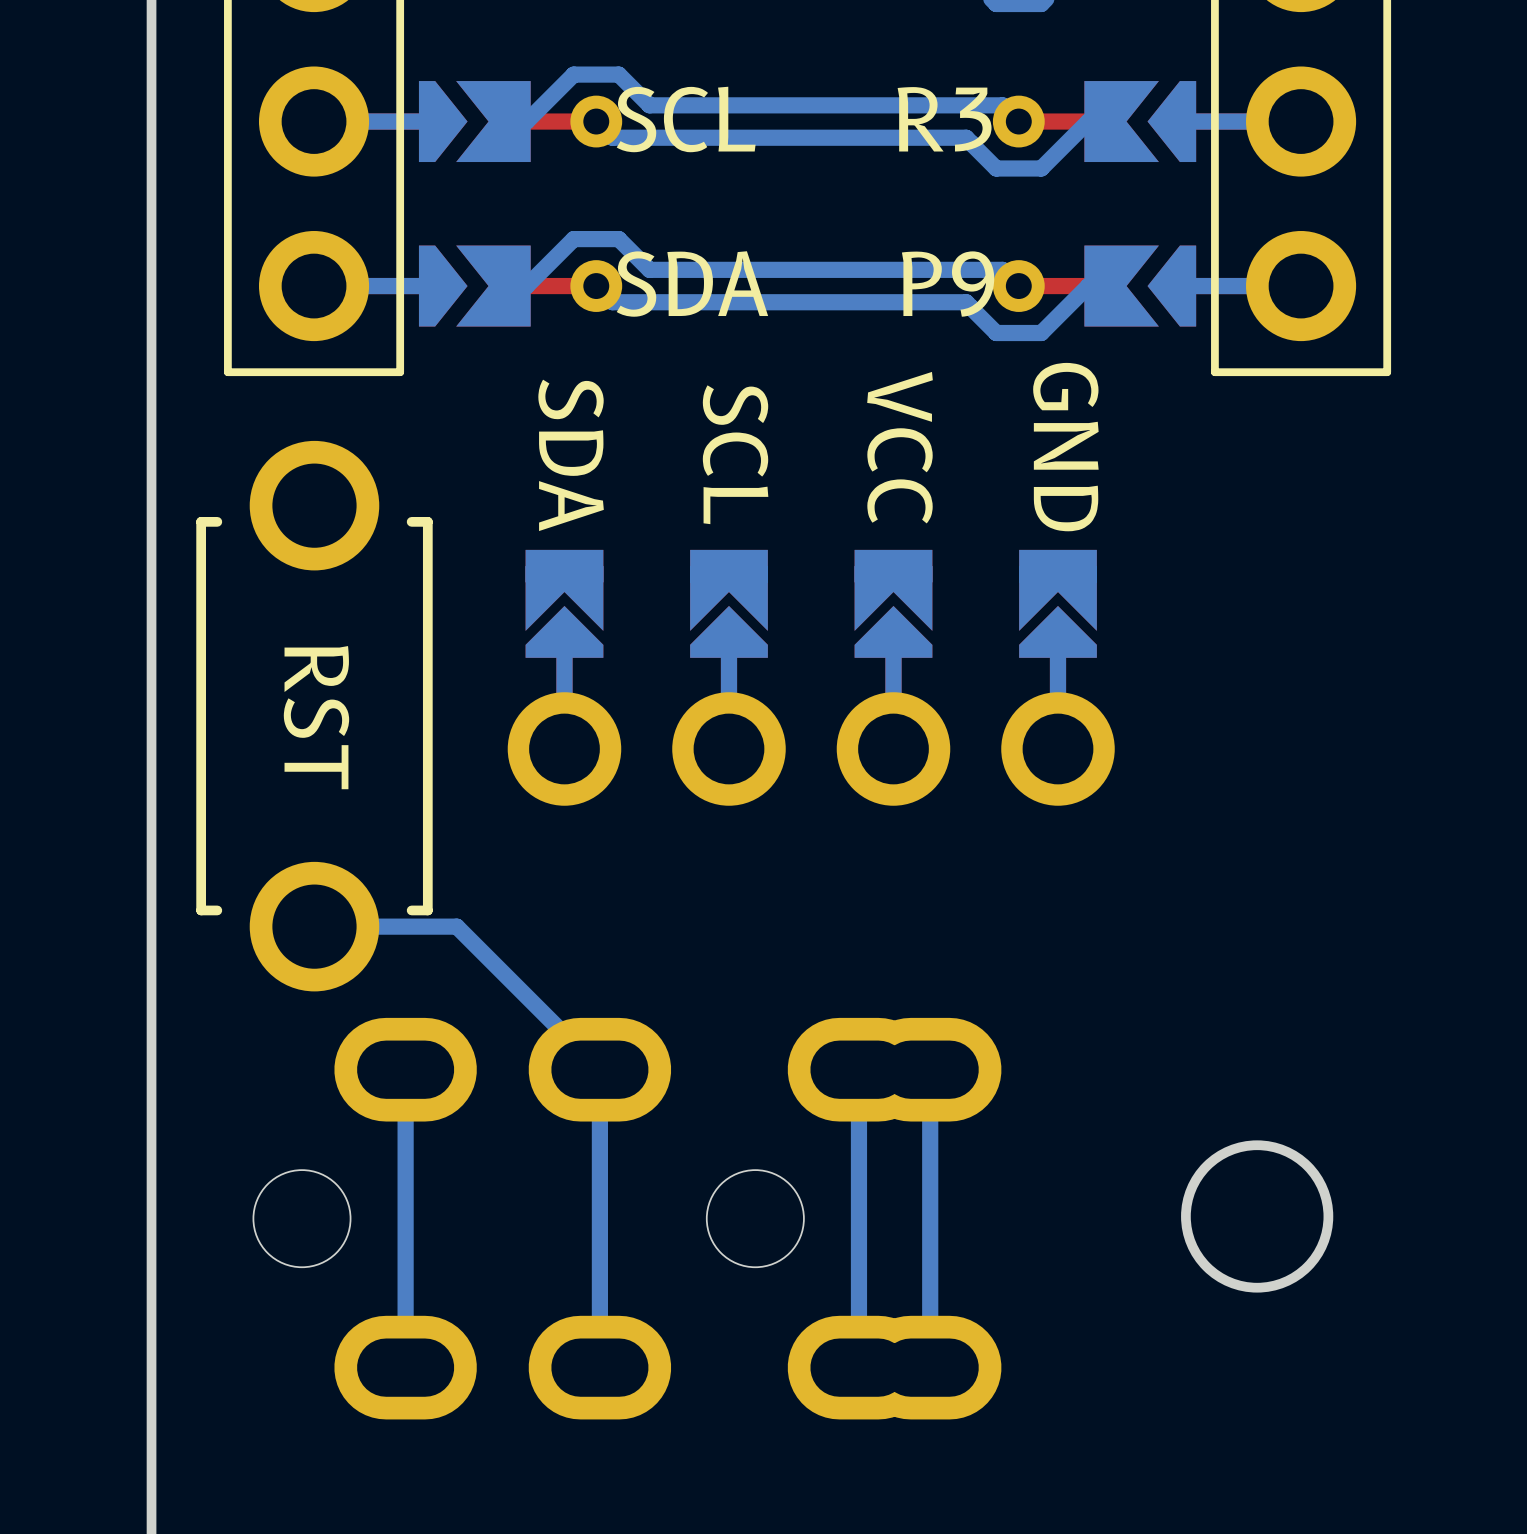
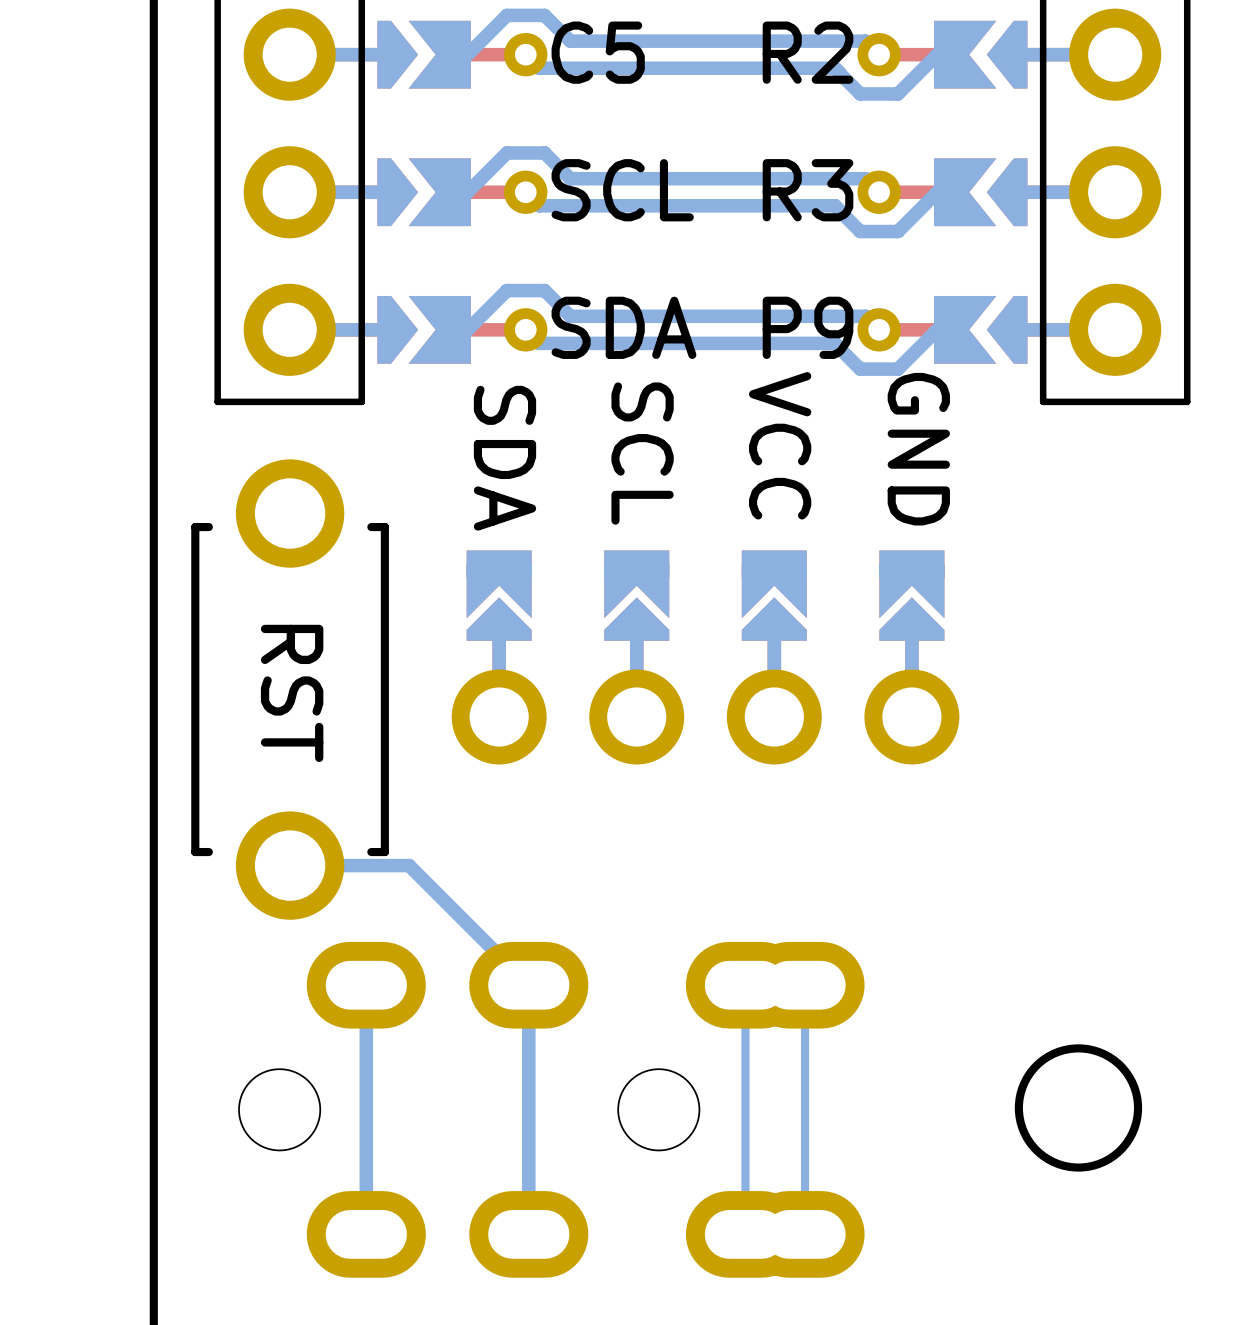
bottom track width: thick (858, 1069) (858, 1367) -> thin (745, 985) (745, 1234)
bottom track width: thick (930, 1069) (930, 1367) -> thin (805, 985) (805, 1234)

